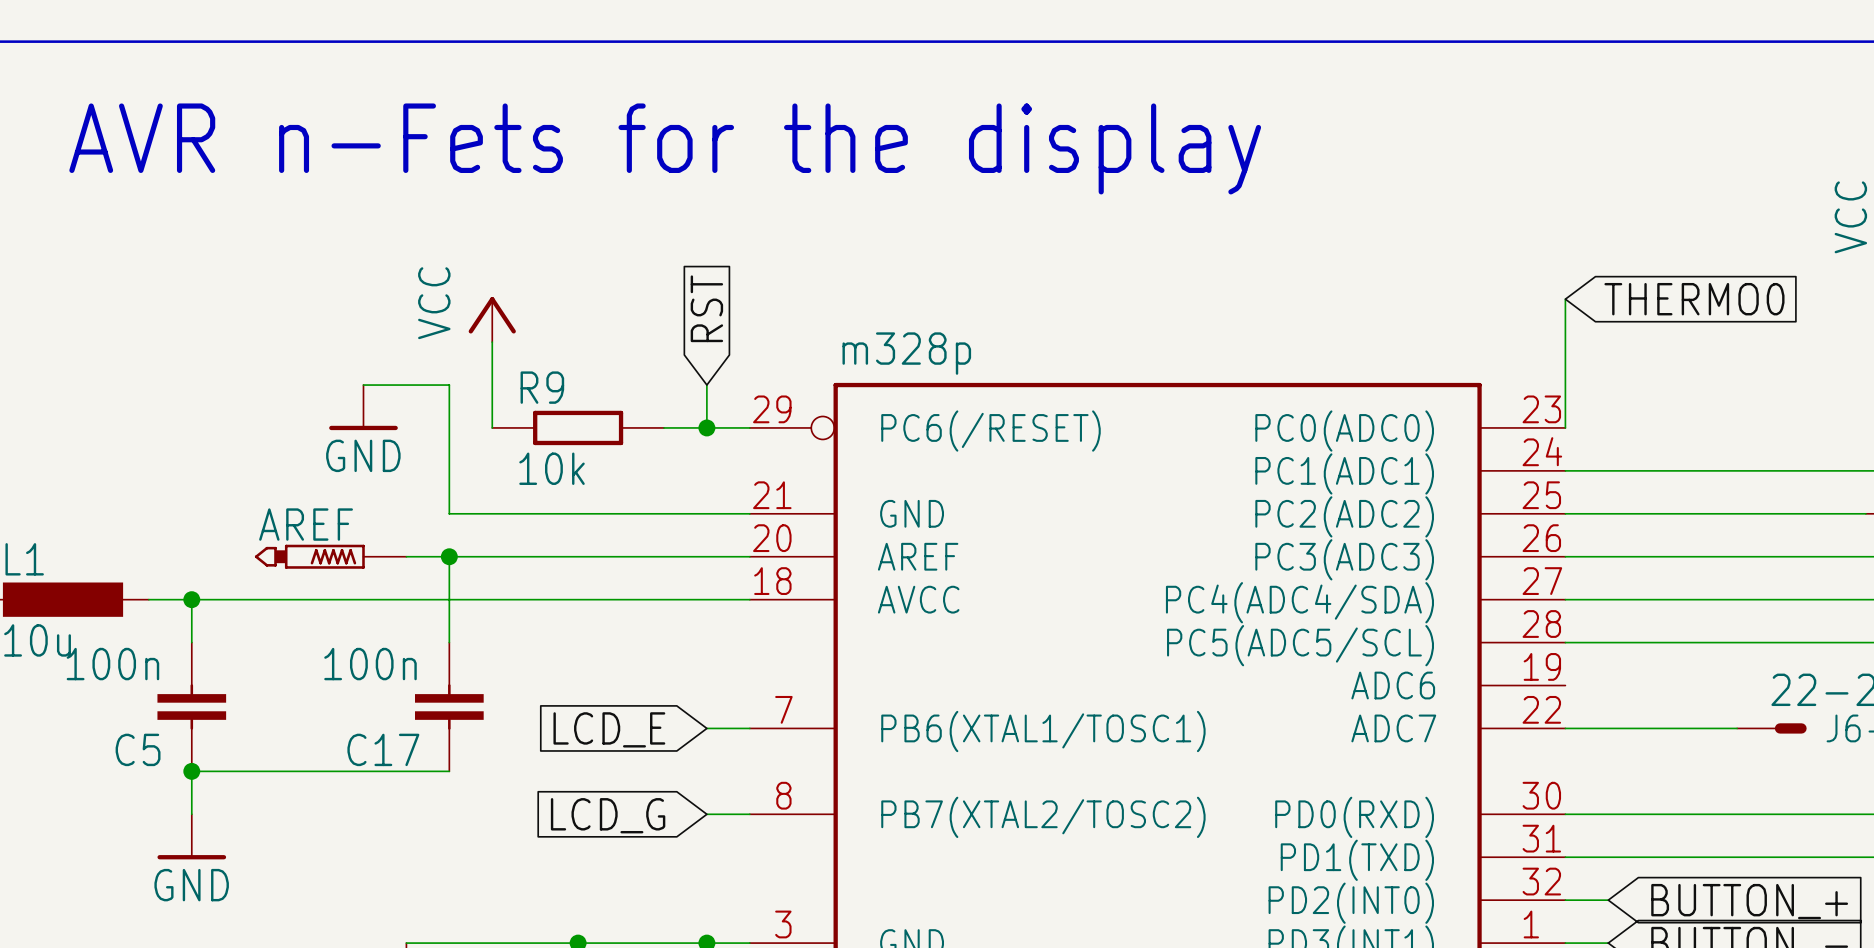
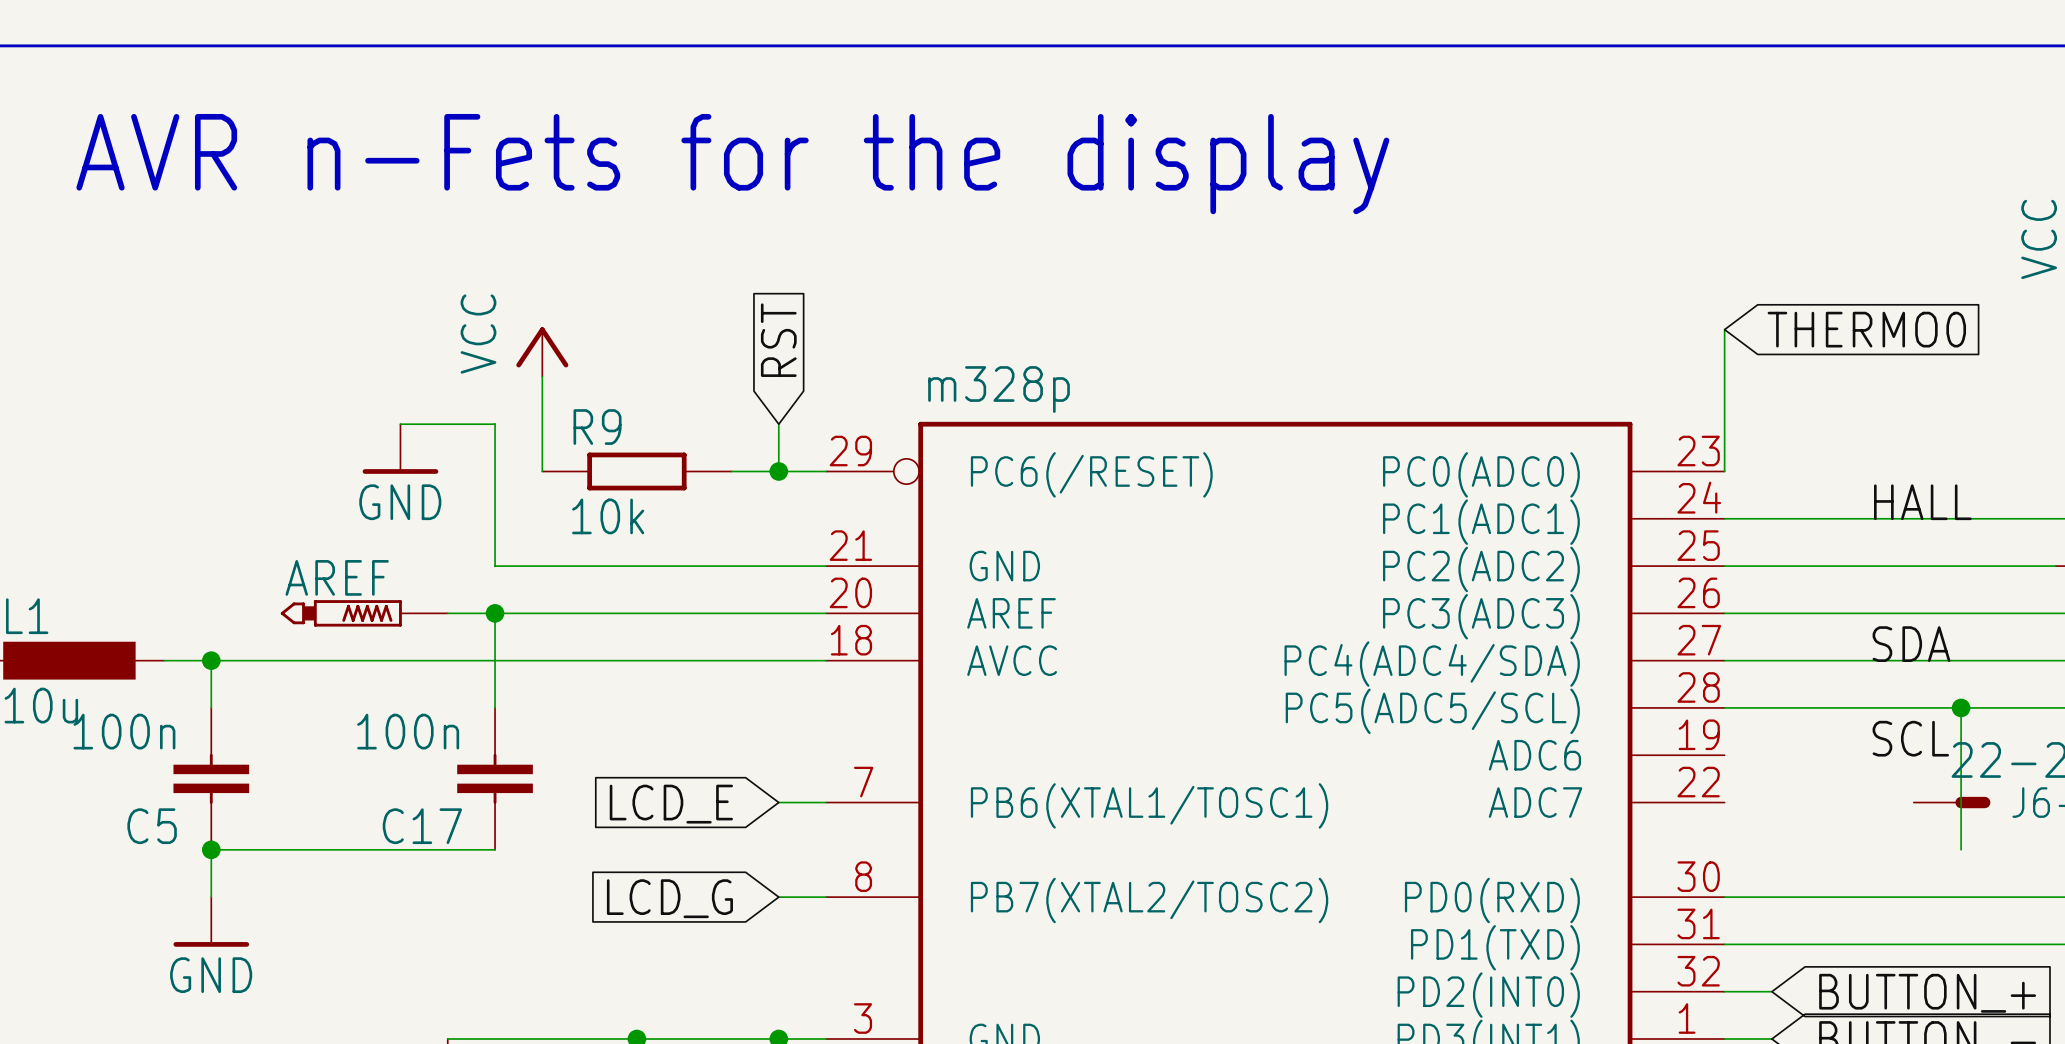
label: none -> HALL (1922, 502)
label: none -> SDA (1911, 644)
wire: none -> (1961, 707) (1961, 849)
junction: none -> (1961, 707)
label: none -> SCL (1910, 738)
wire: (1565, 728) (1737, 728) -> none

